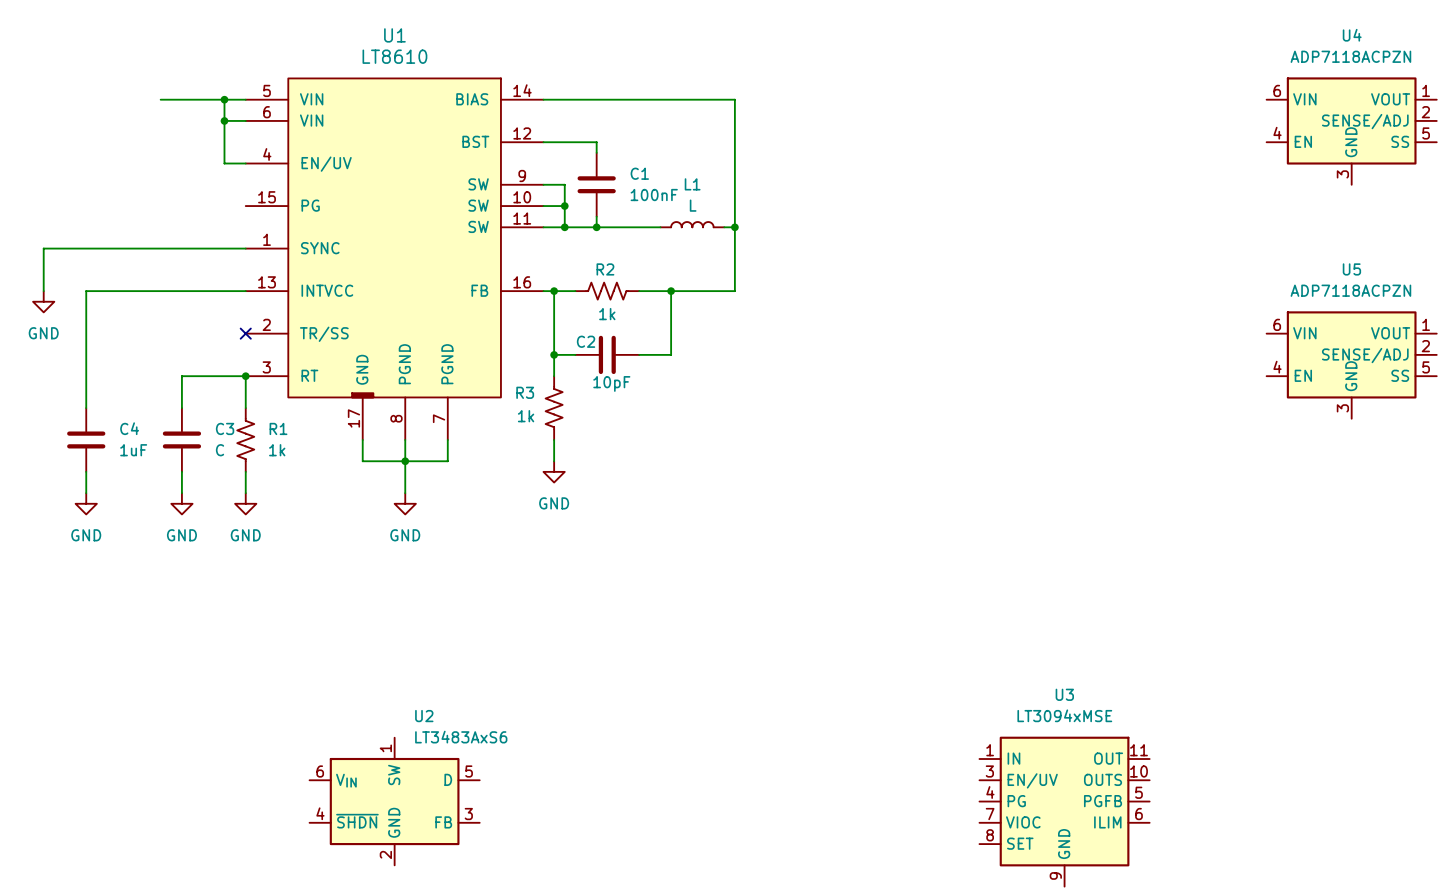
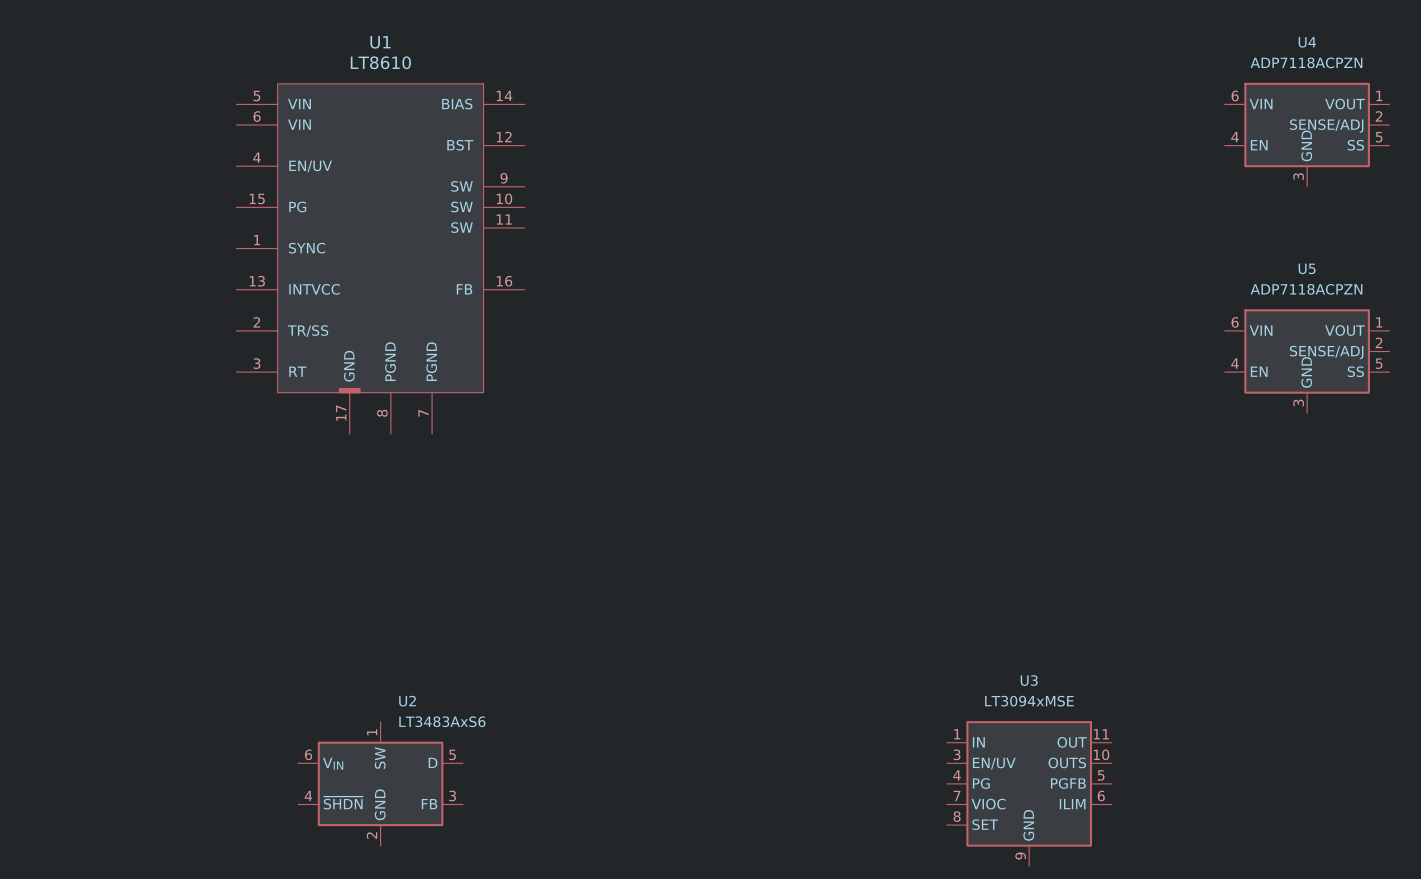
wire: (160, 99) (245, 99) -> none
wire: (224, 99) (224, 163) (245, 163) -> none
junction: (224, 99) -> none
wire: (543, 99) (734, 99) (734, 291) (639, 291) -> none
wire: (224, 120) (245, 120) -> none
junction: (224, 120) -> none
wire: (543, 142) (596, 142) (596, 152) -> none
wire: (543, 184) (564, 184) (564, 227) -> none
C1: 100nF (596, 184) -> none
wire: (543, 206) (564, 206) -> none
junction: (564, 206) -> none
wire: (596, 216) (596, 227) -> none
L1: L (692, 224) -> none
wire: (543, 227) (660, 227) -> none
junction: (564, 227) -> none
junction: (596, 227) -> none
wire: (724, 227) (734, 227) -> none
junction: (734, 227) -> none
wire: (245, 248) (43, 248) (43, 291) -> none
wire: (245, 291) (86, 291) (86, 408) -> none
wire: (543, 291) (575, 291) -> none
wire: (554, 291) (554, 376) -> none
junction: (554, 291) -> none
R2: 1k (607, 291) -> none
wire: (671, 291) (671, 354) (639, 354) -> none
junction: (671, 291) -> none
power symbol: GND (43, 301) -> none
no-connect mark: (245, 333) -> none
wire: (554, 354) (575, 354) -> none
junction: (554, 354) -> none
C2: 10pF (607, 354) -> none
junction: (245, 376) -> none
wire: (181, 408) (181, 376) (245, 376) (245, 408) -> none
R3: 1k (554, 408) -> none
C4: 1uF (86, 439) -> none
C3: C (181, 439) -> none
R1: 1k (245, 439) -> none
wire: (362, 439) (362, 461) (447, 461) (447, 439) -> none
wire: (405, 439) (405, 493) -> none
wire: (554, 439) (554, 461) -> none
junction: (405, 461) -> none
wire: (86, 471) (86, 493) -> none
wire: (181, 471) (181, 493) -> none
wire: (245, 471) (245, 493) -> none
power symbol: GND (554, 471) -> none
power symbol: GND (86, 503) -> none
power symbol: GND (181, 503) -> none
power symbol: GND (245, 503) -> none
power symbol: GND (405, 503) -> none

